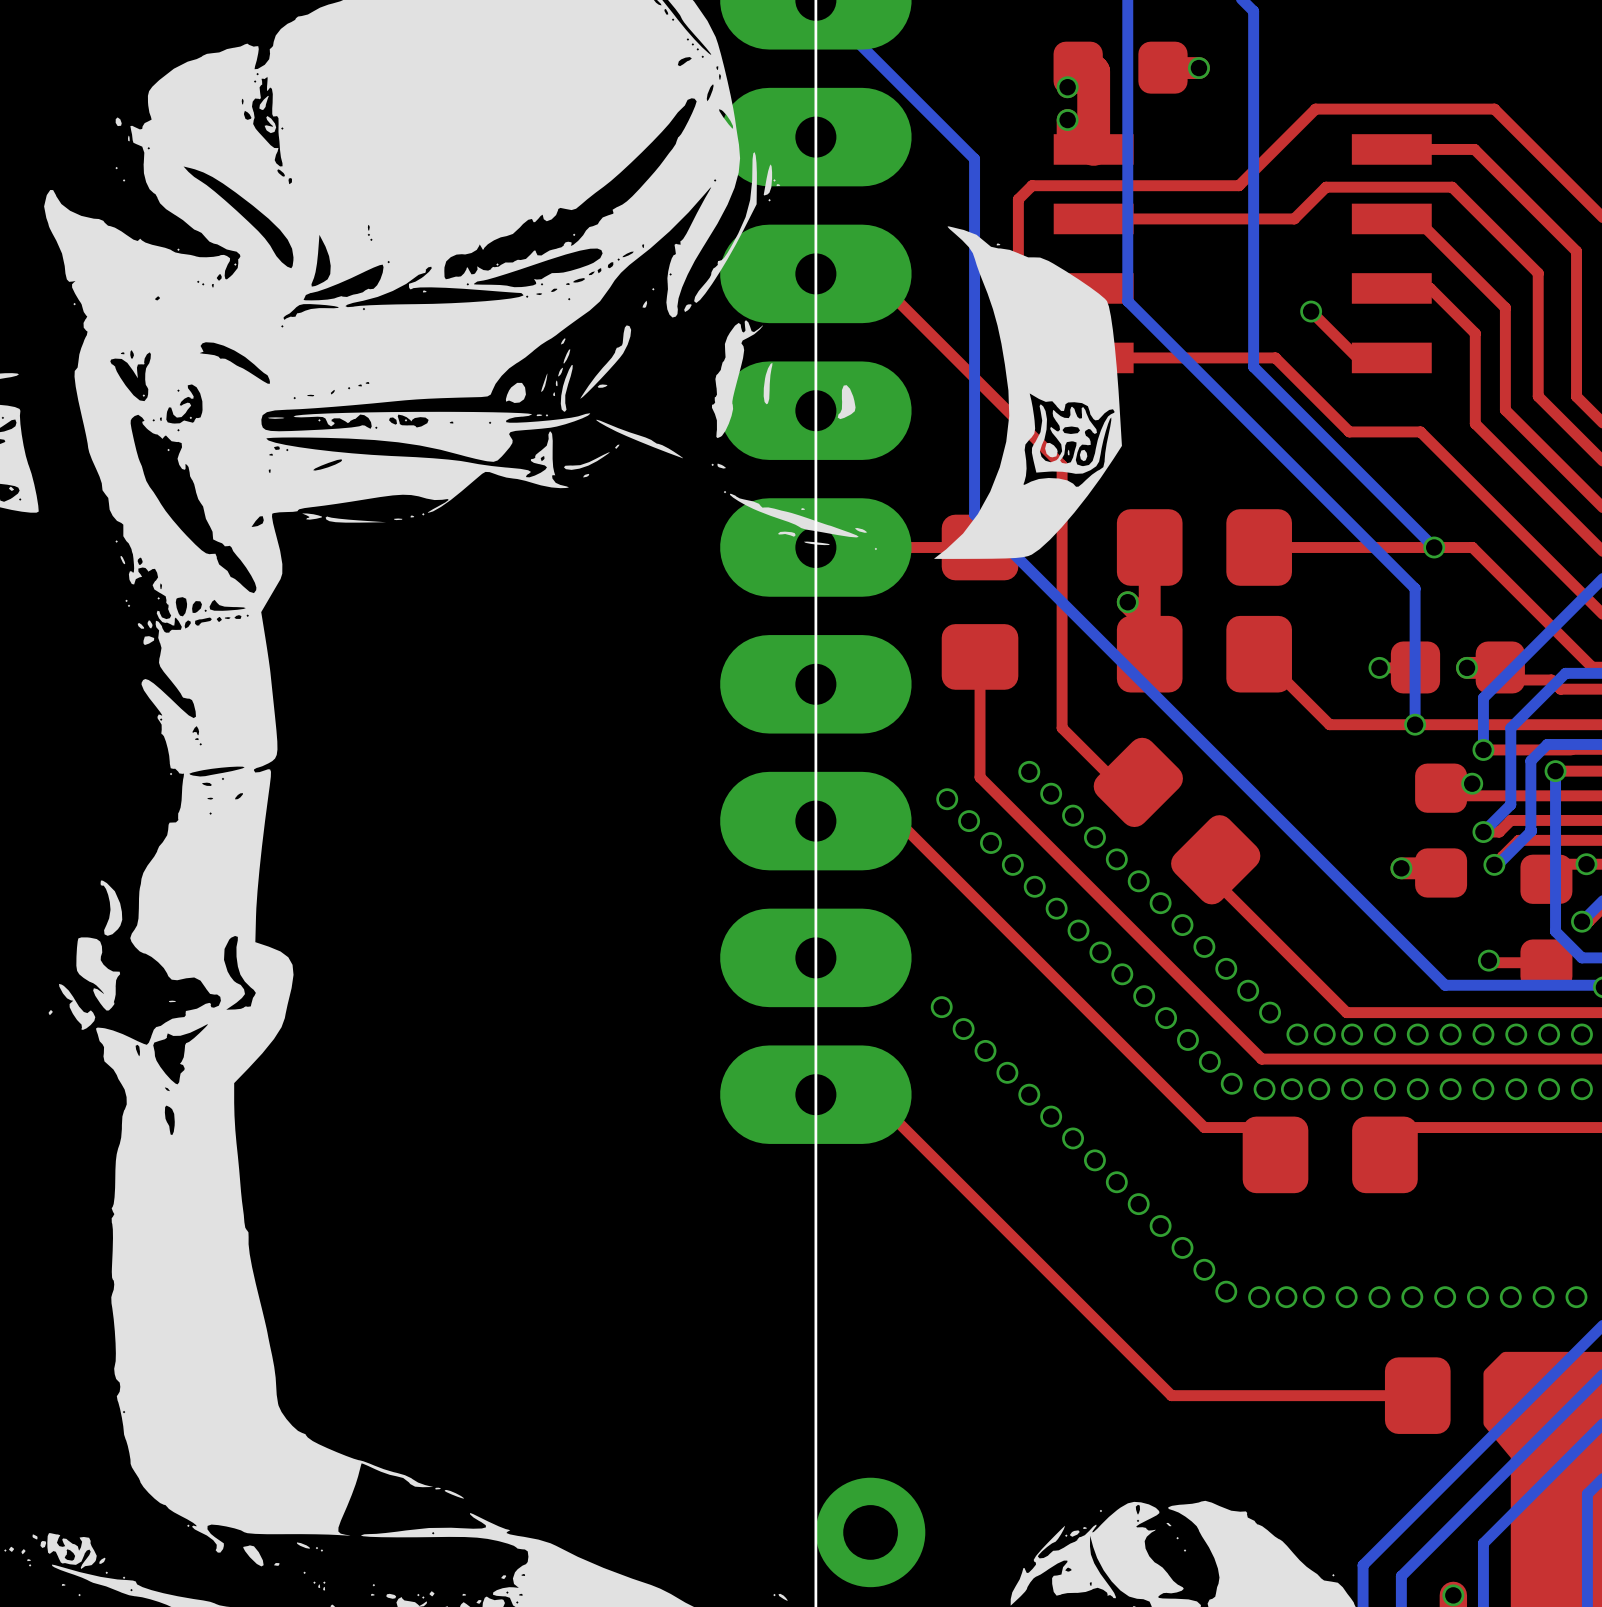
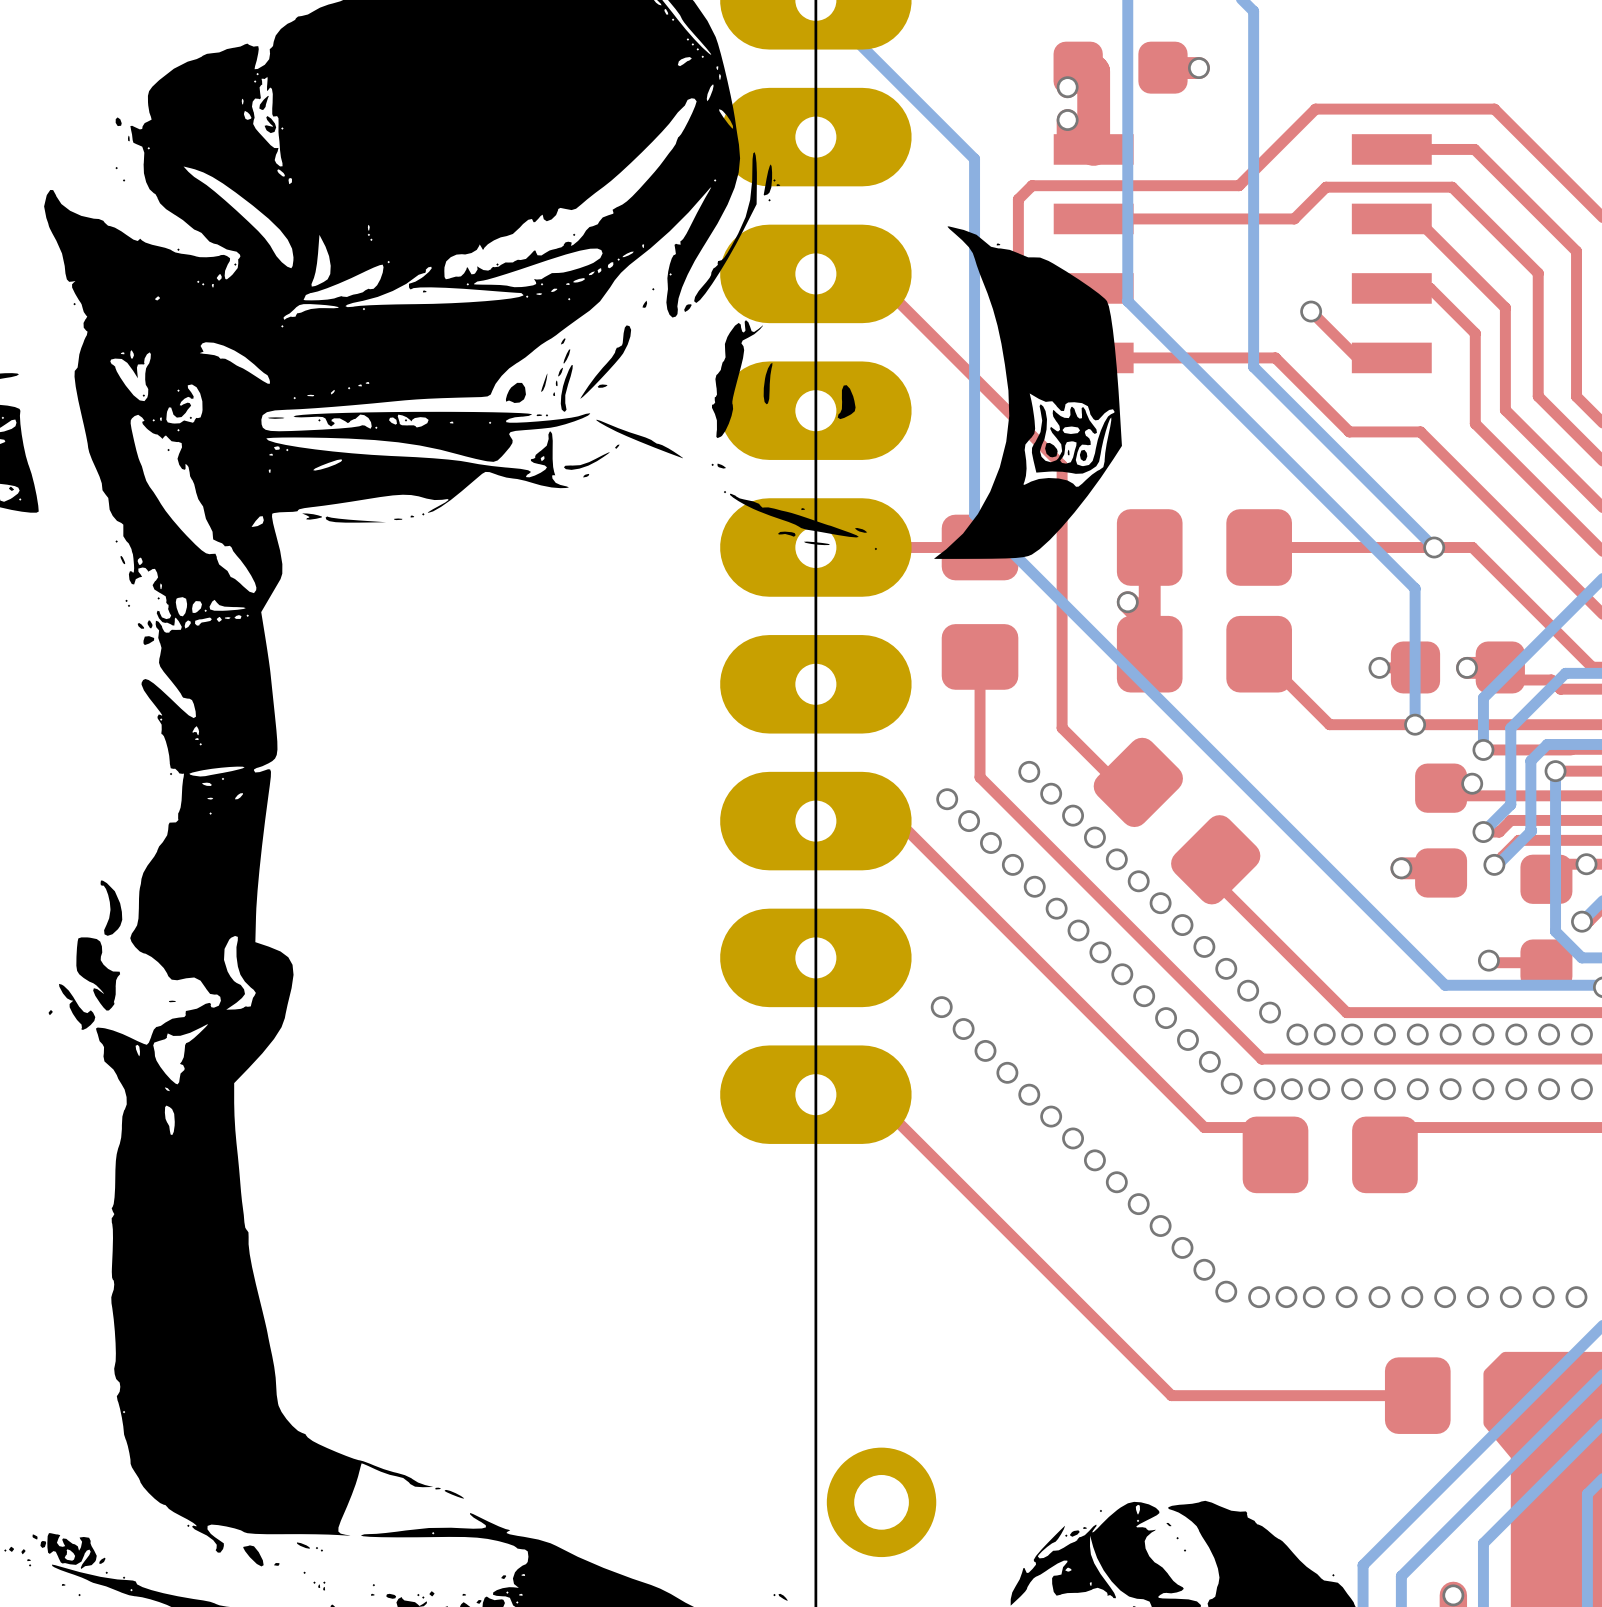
part position: (870, 1532) -> (881, 1502)

